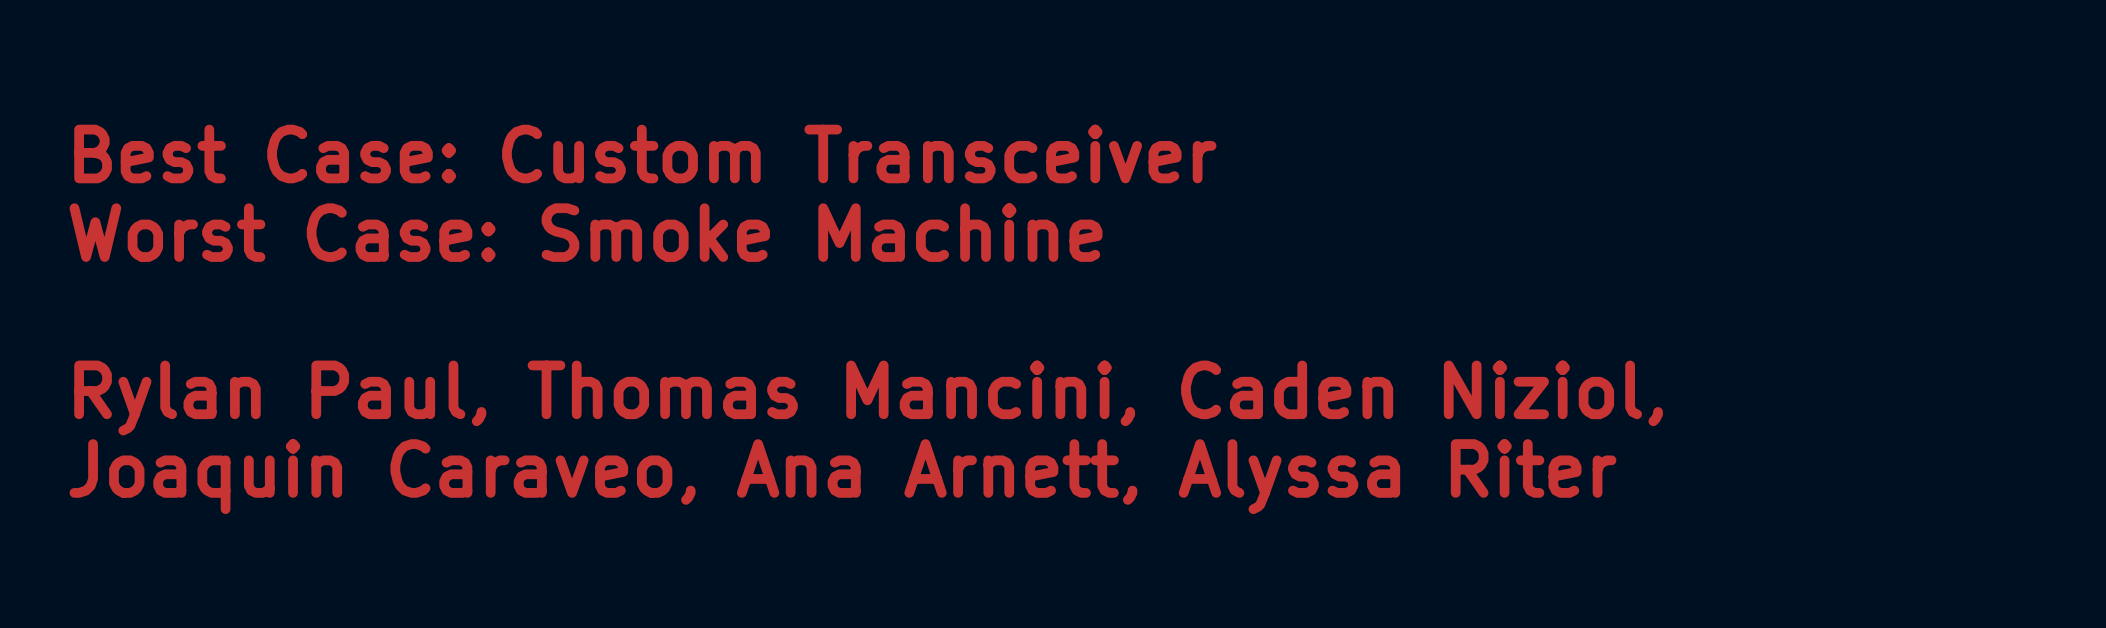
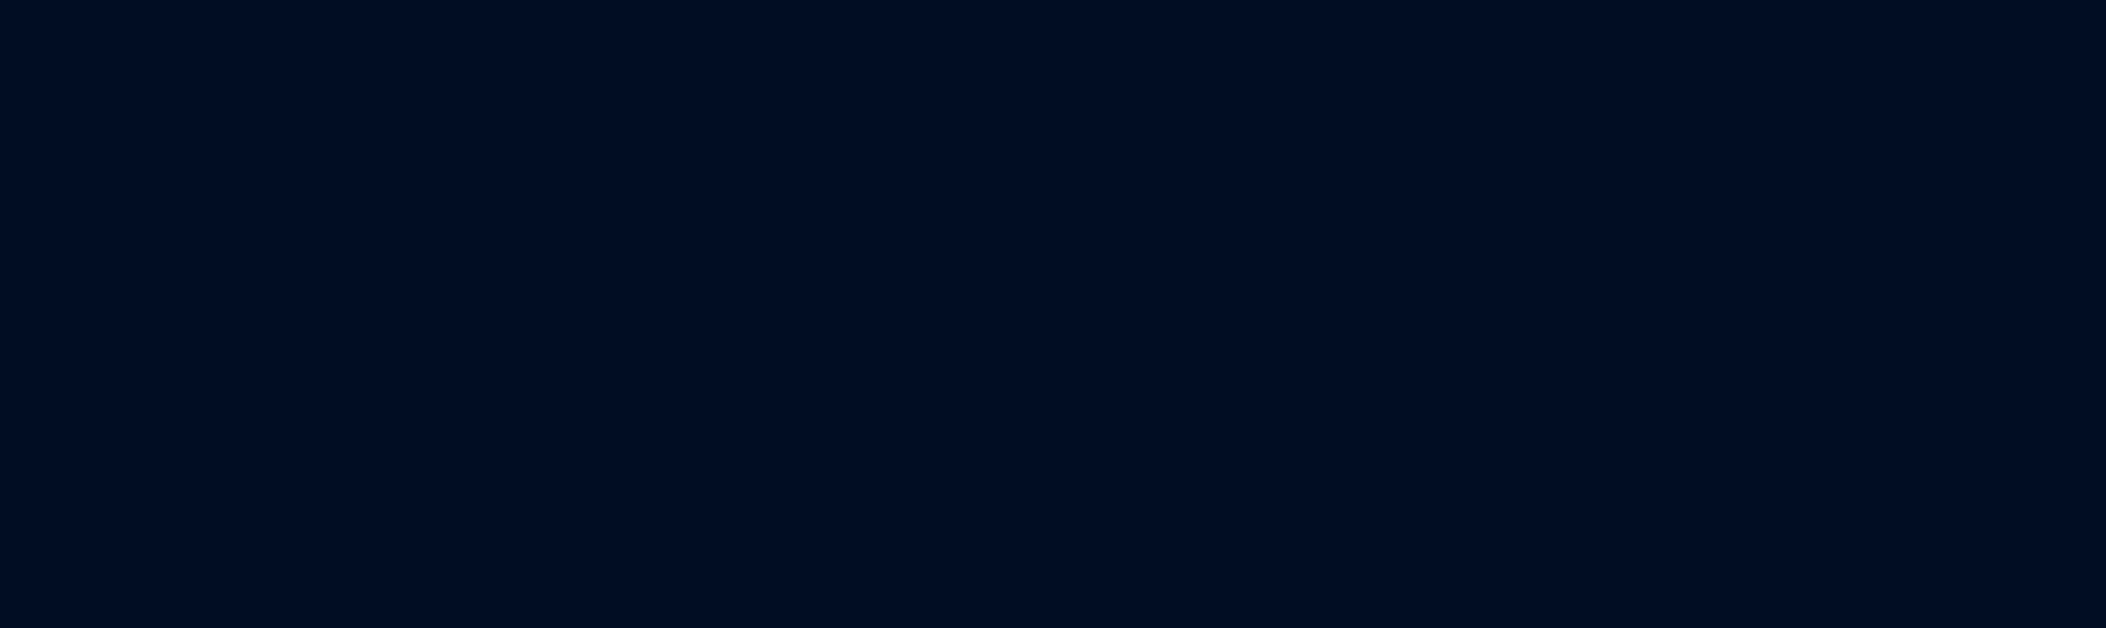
text: Best Case: Custom Transceiver (645, 153) -> none
text: Worst Case: Smoke Machine (586, 232) -> none
text: Rylan Paul, Thomas Mancini, Caden Niziol, (868, 397) -> none
text: Joaquin Caraveo, Ana Arnett, Alyssa Riter (842, 476) -> none

